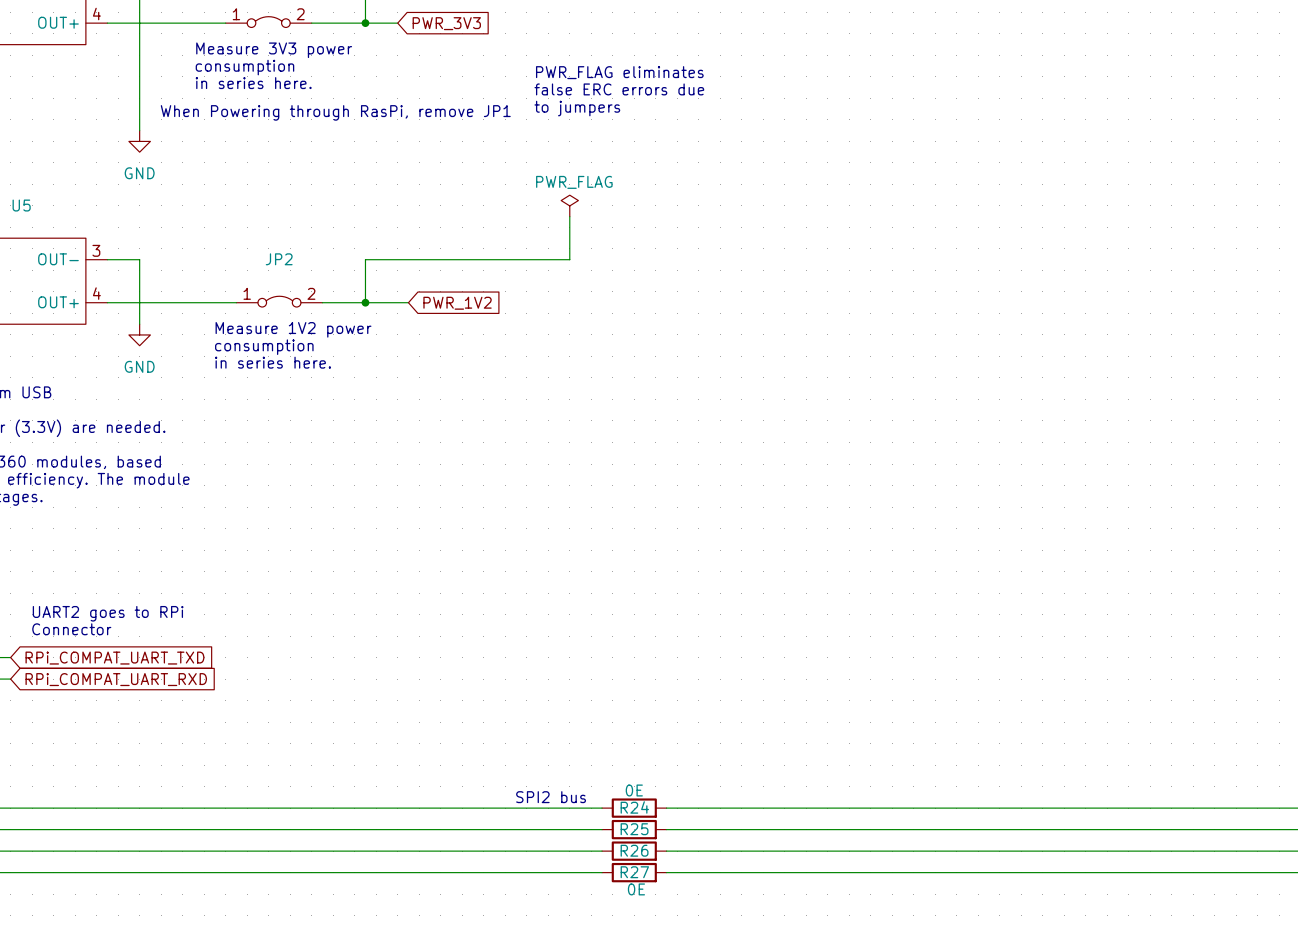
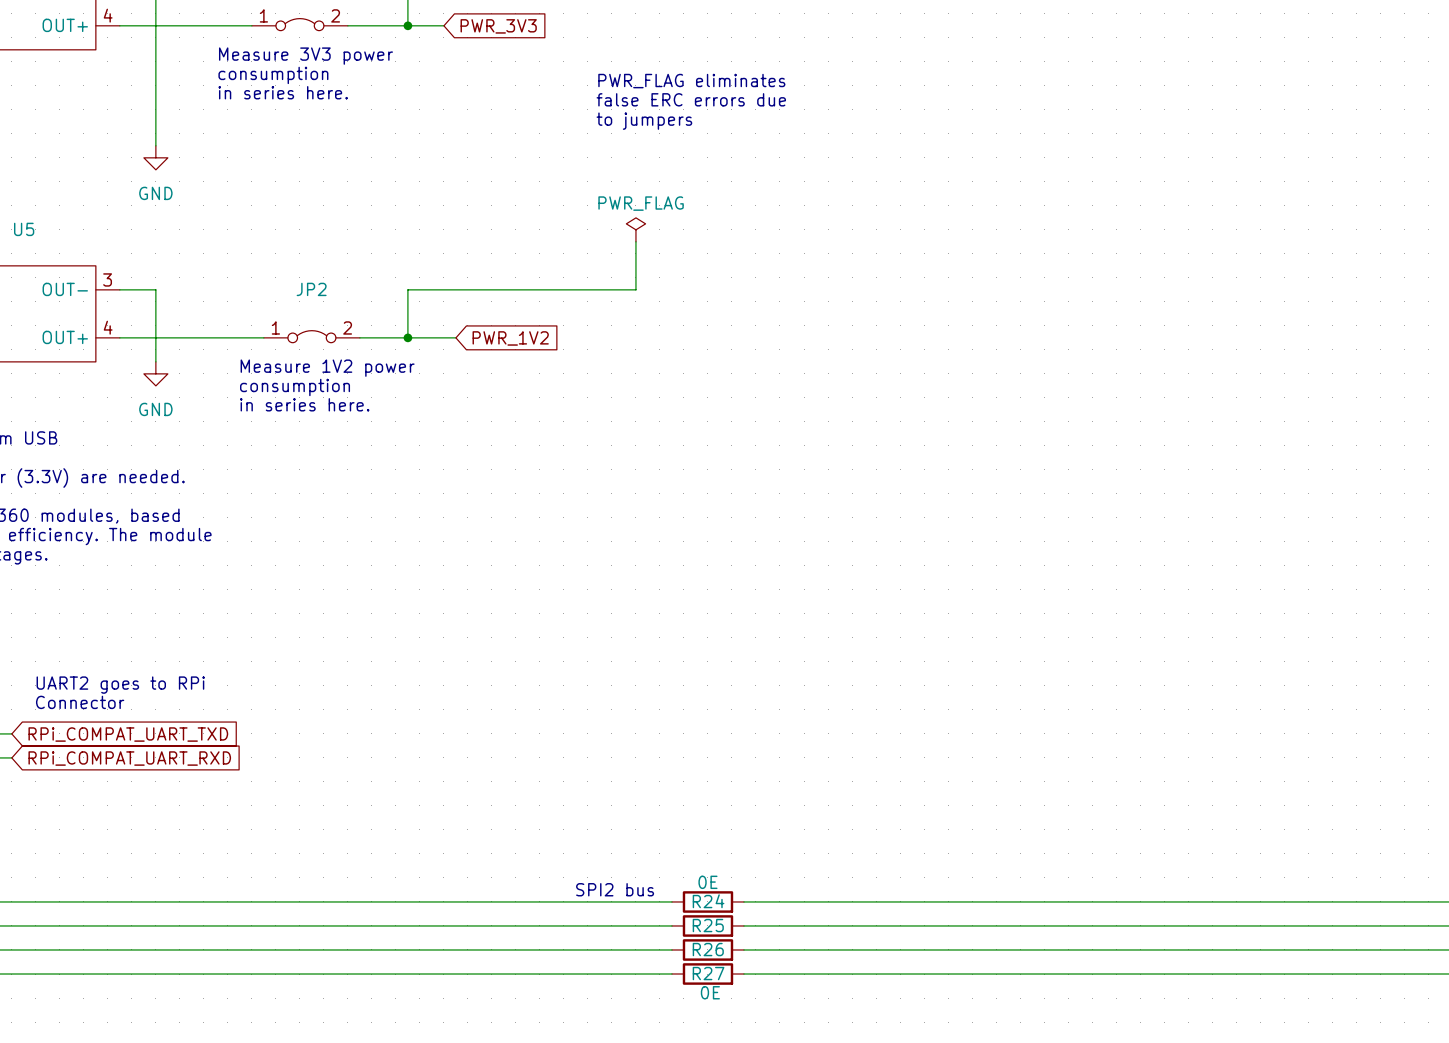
text: When Powering through RasPi, remove JP1 (335, 112) -> none

